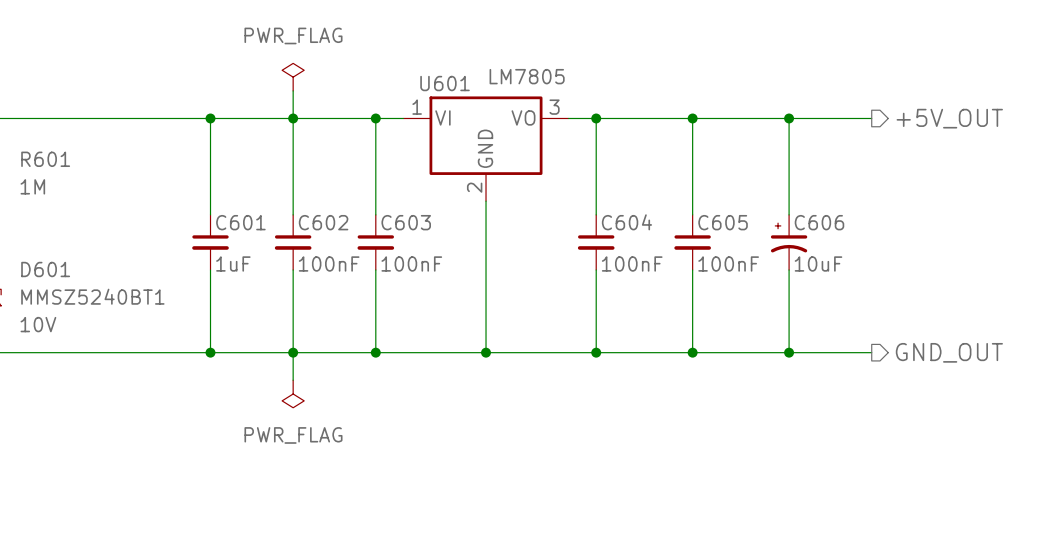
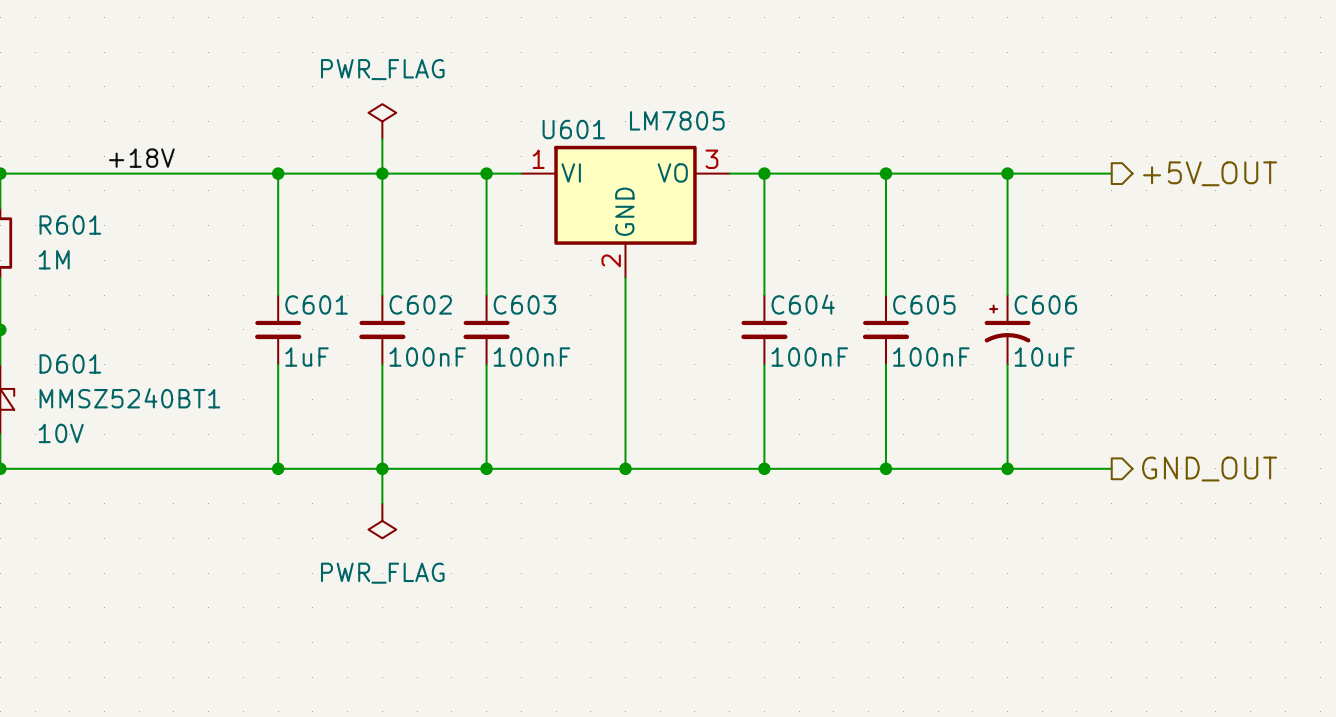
label: none -> +18V (141, 158)

